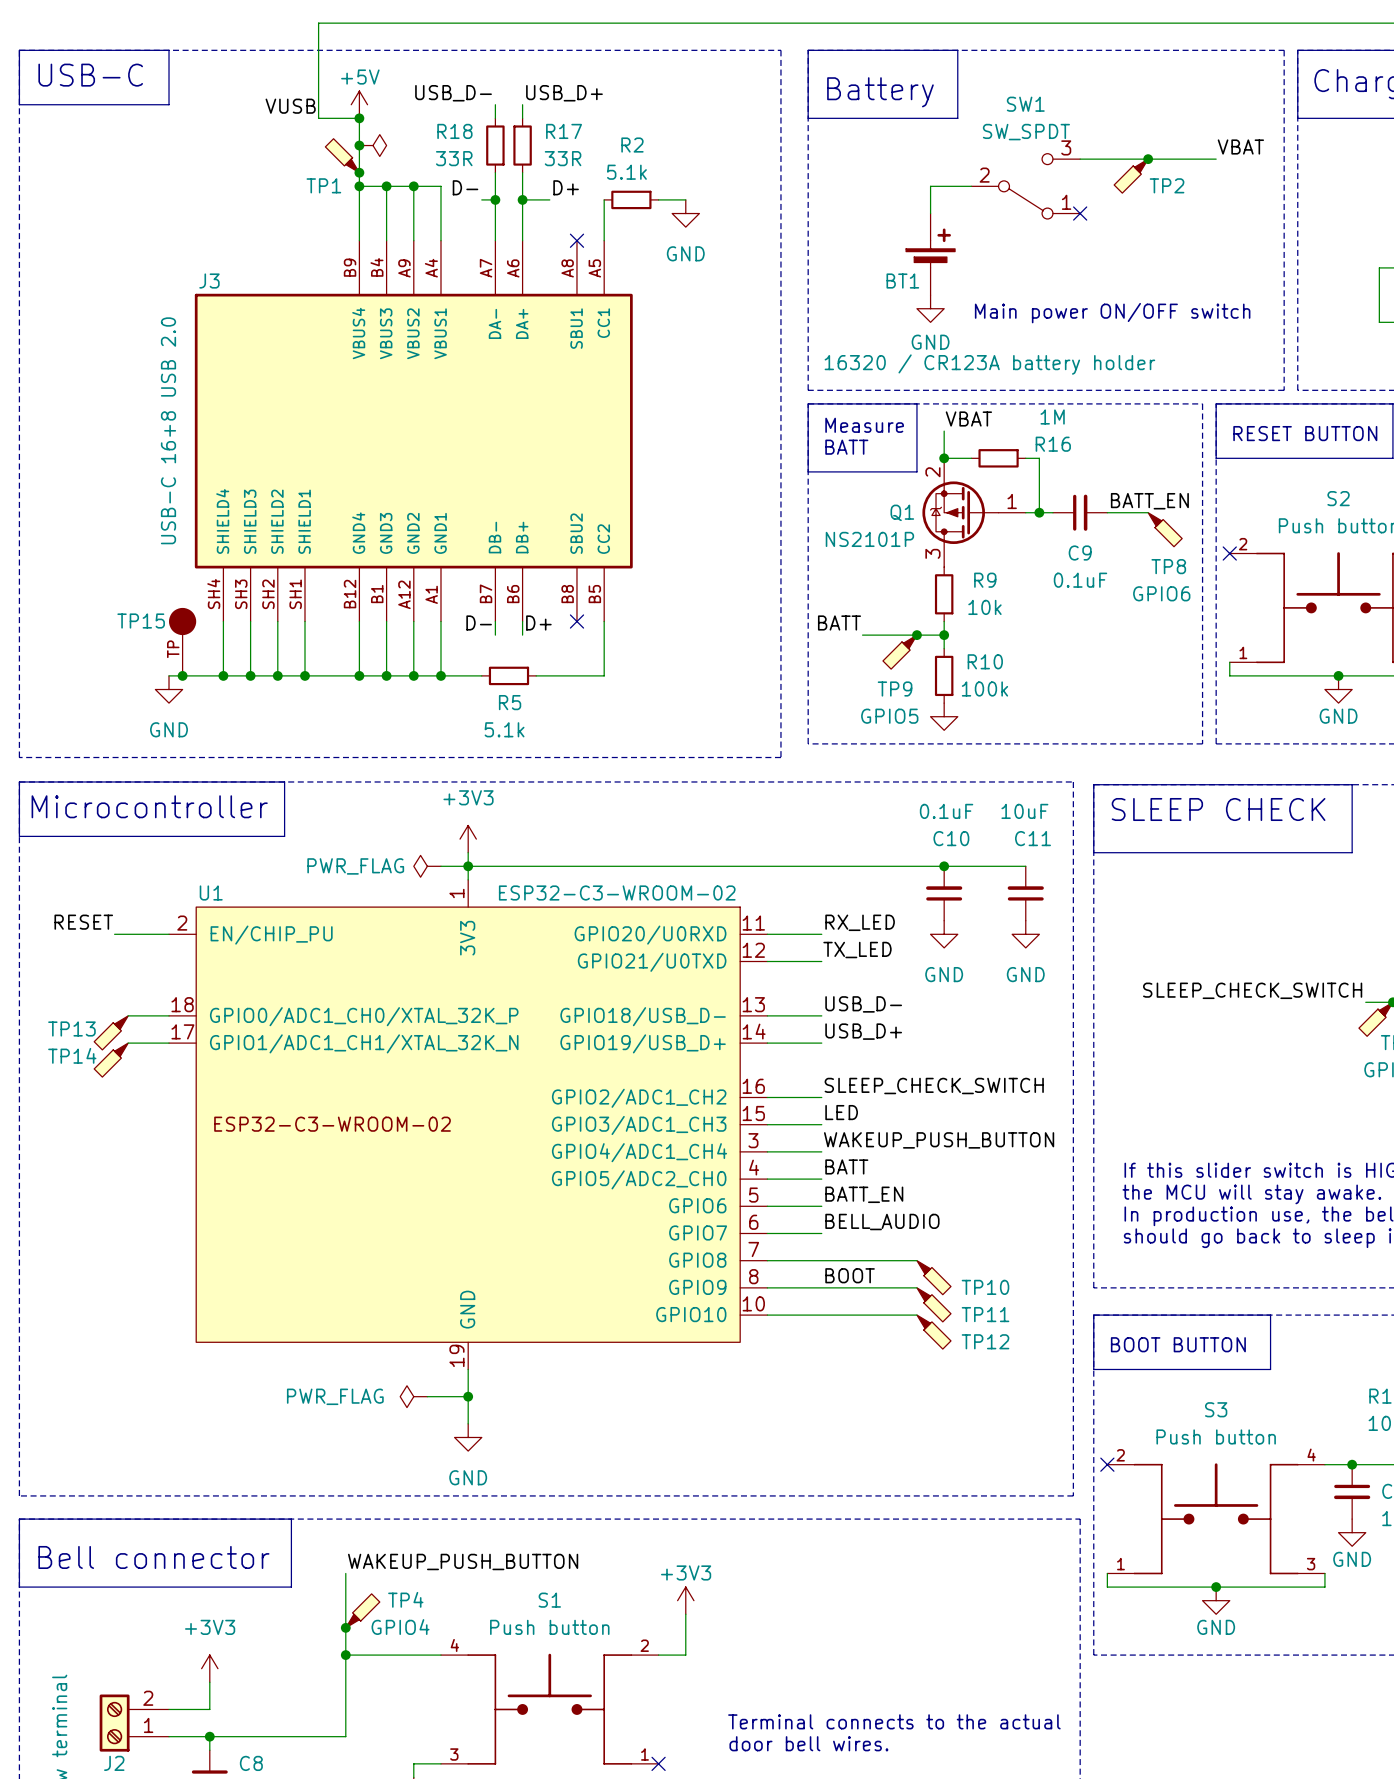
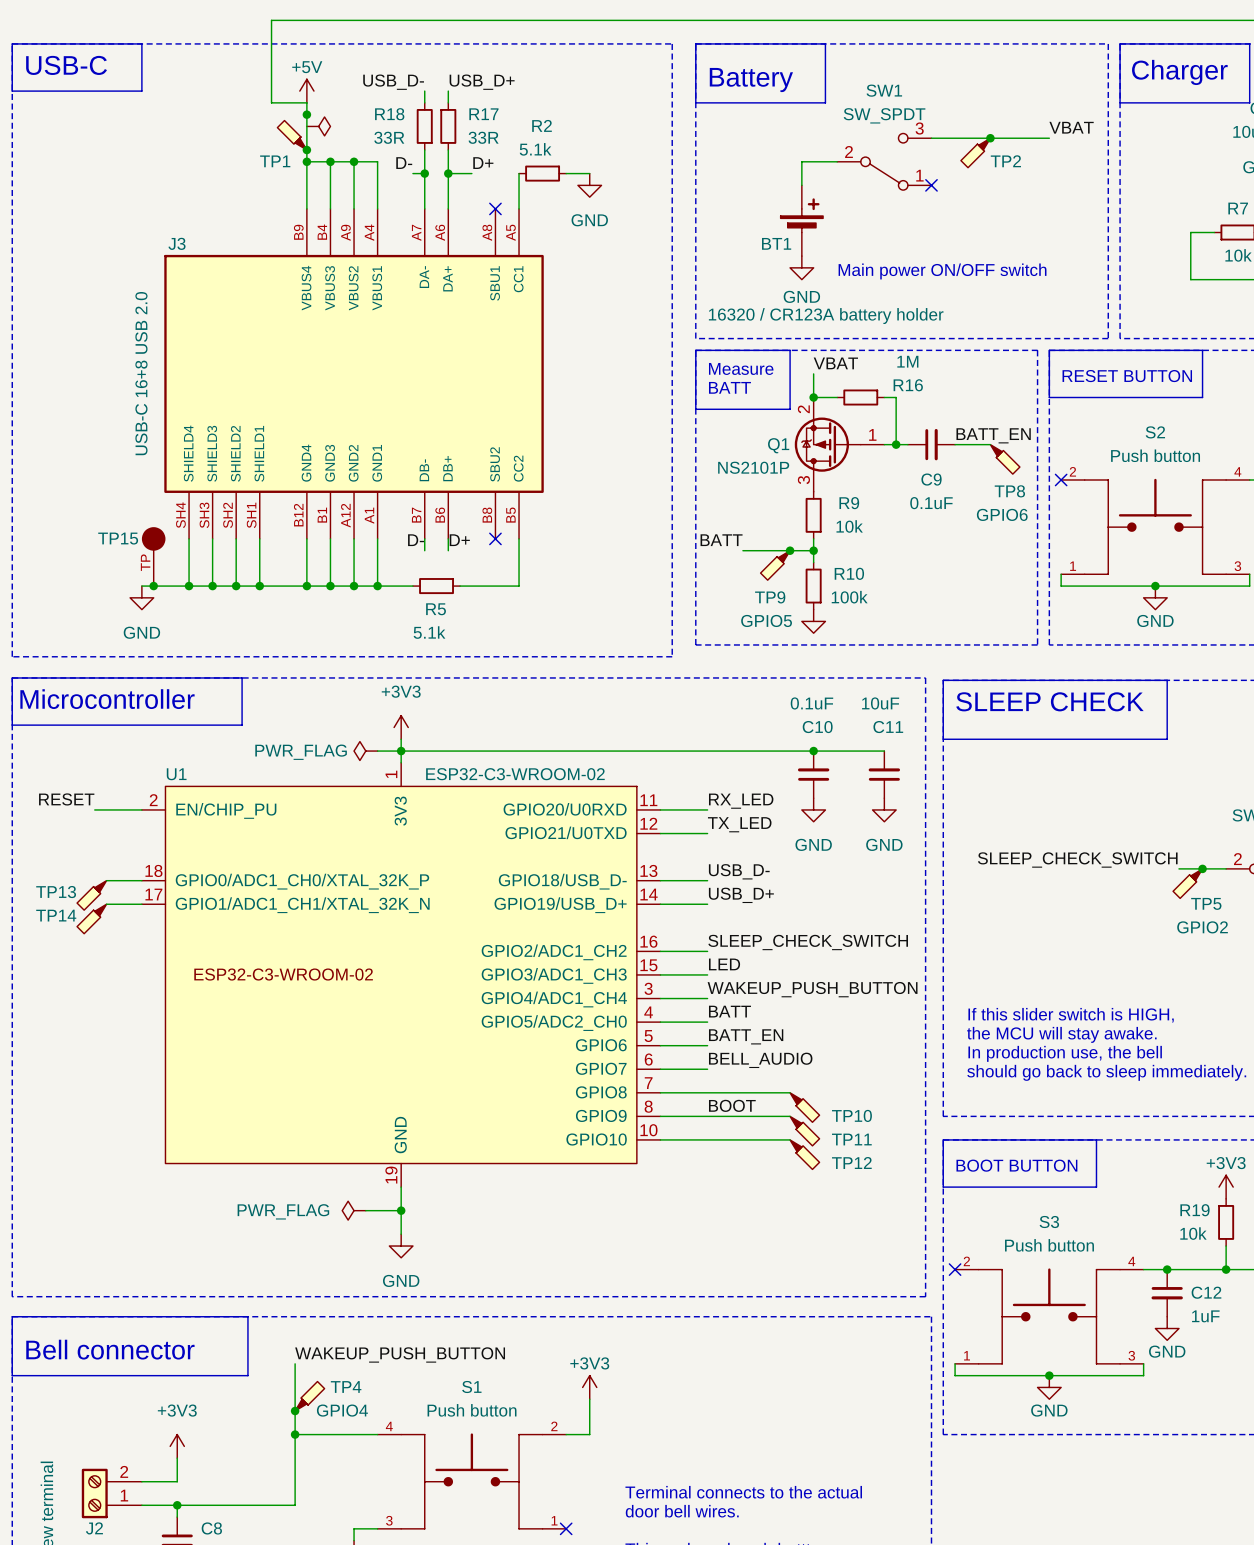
label: VUSB (290, 106) -> none
junction: (359, 118) -> none
junction: none -> (306, 114)
junction: (359, 145) -> none

